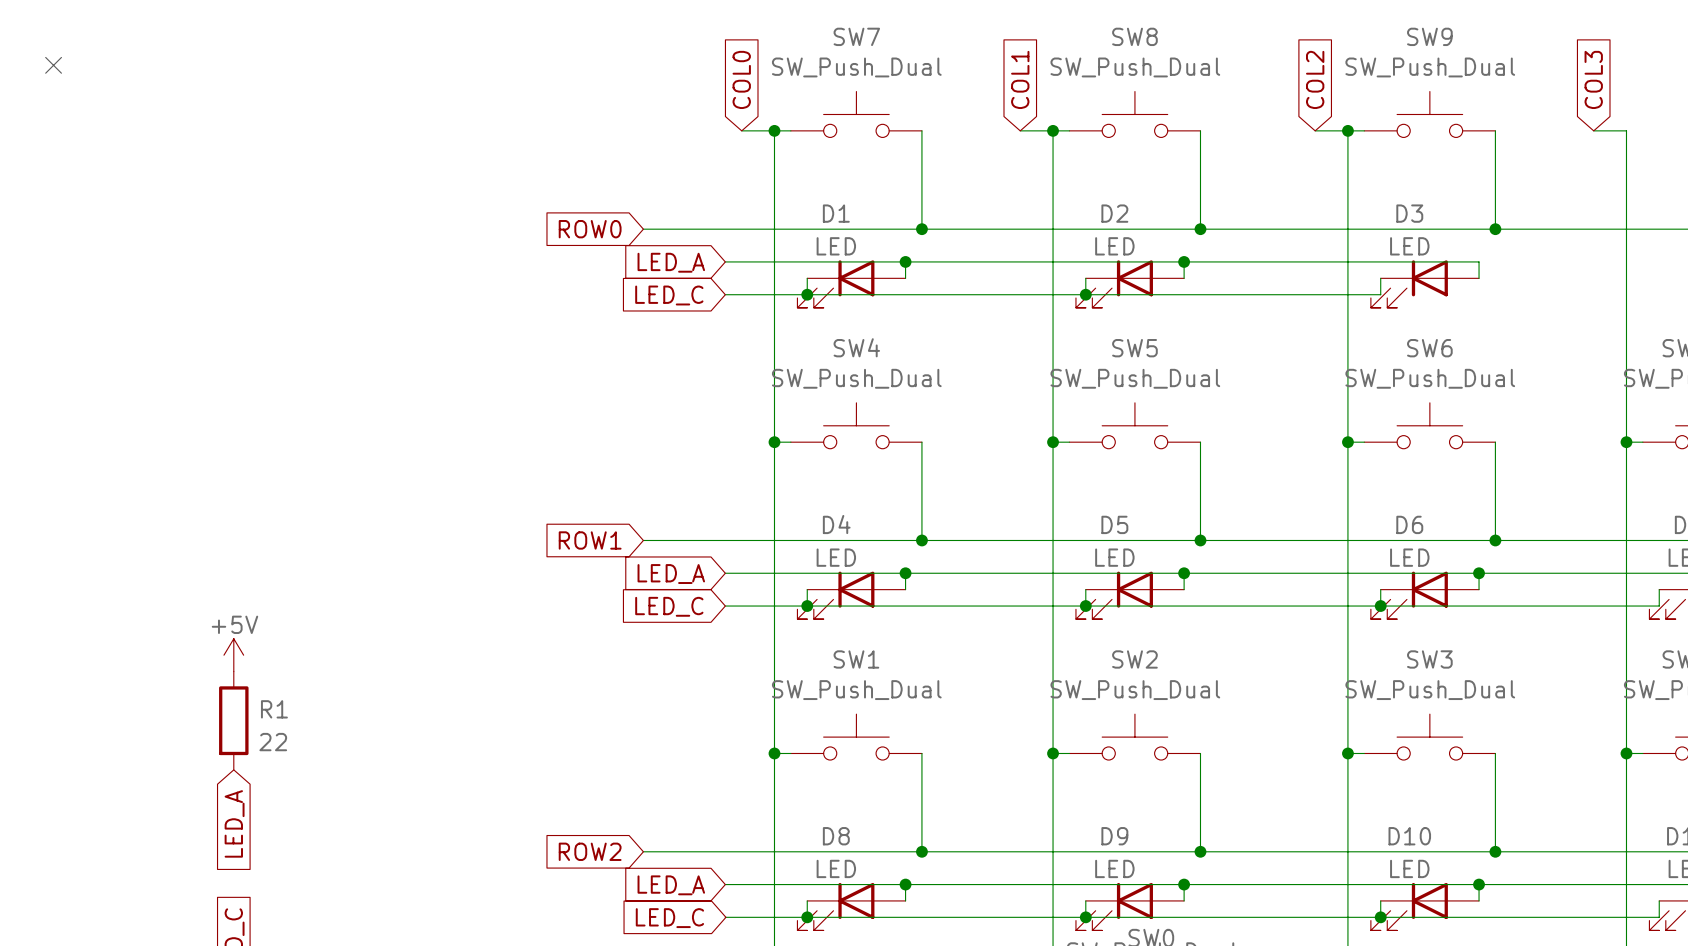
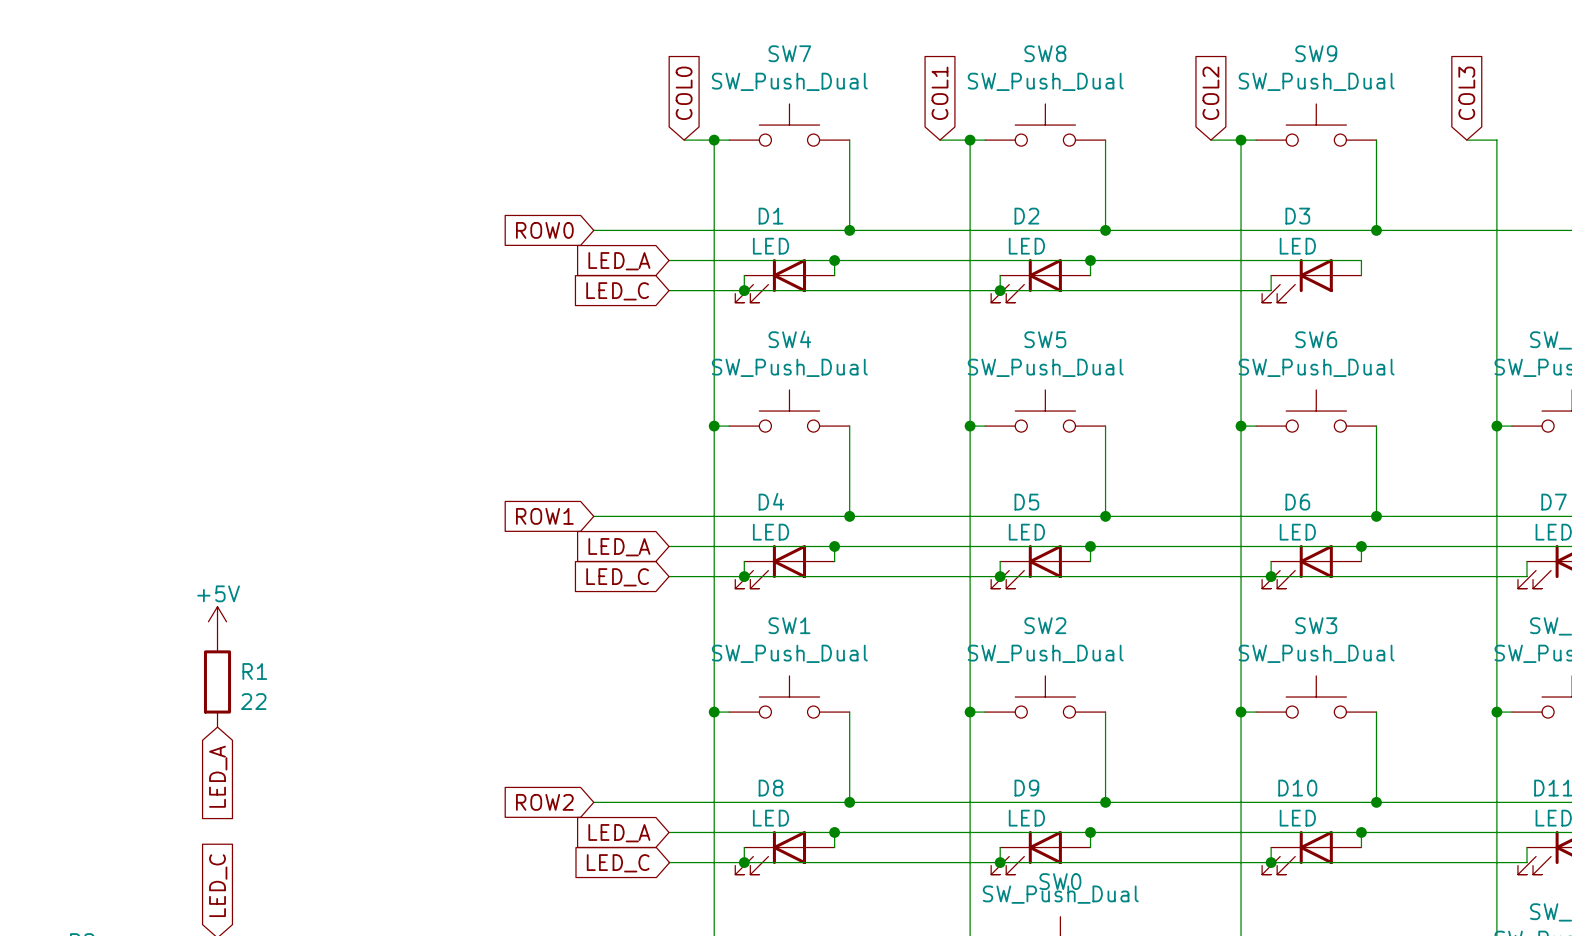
no-connect mark: (53, 65) -> none

